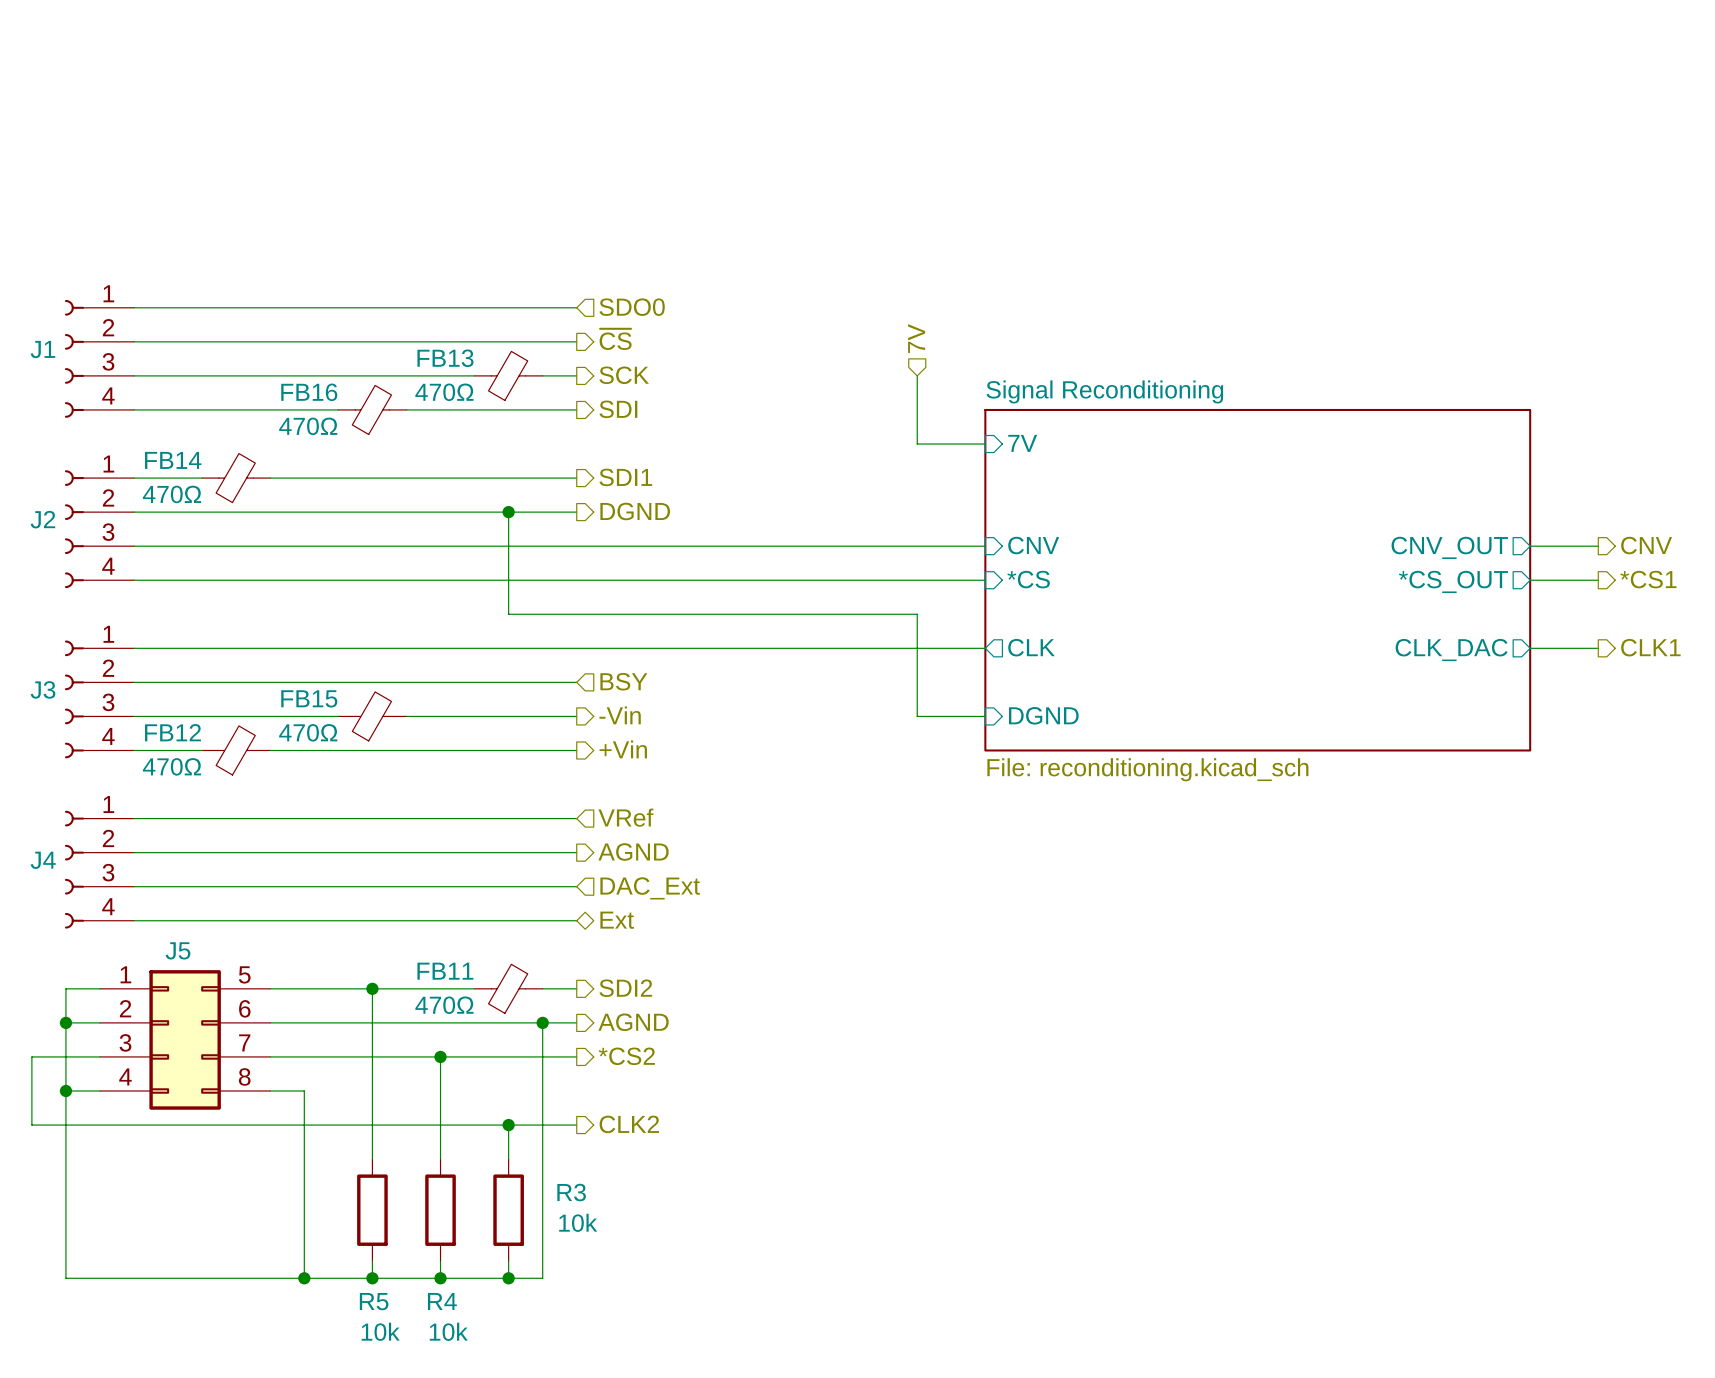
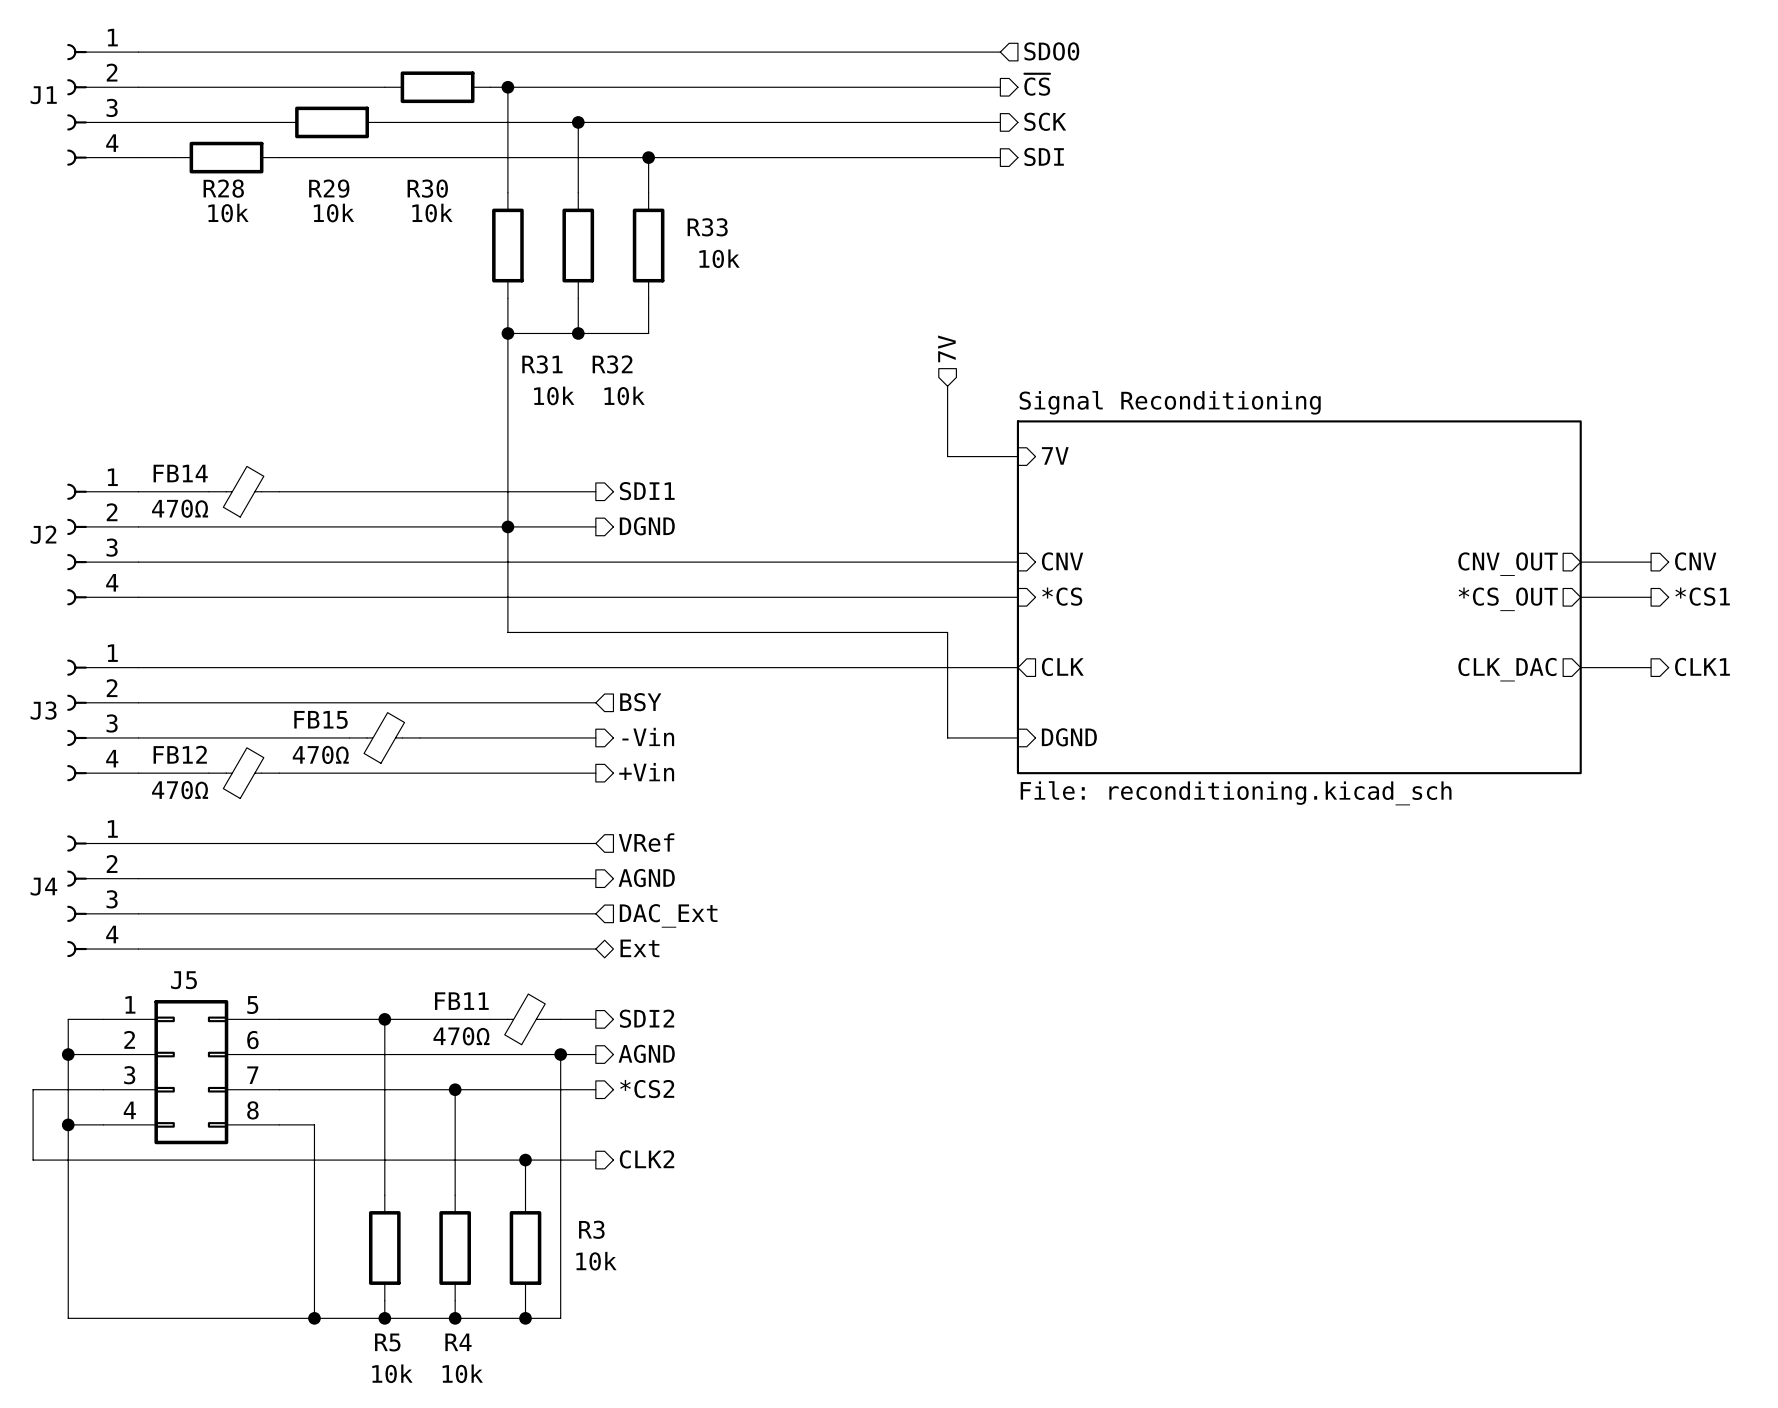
hierarchical label: none -> SDO0 (1051, 51)
wire: none -> (138, 52) (1000, 52)
hierarchical label: none -> ~{CS} (1037, 84)
wire: none -> (138, 87) (384, 87)
R30: none -> 10k (437, 87)
wire: none -> (490, 87) (1000, 87)
wire: none -> (507, 87) (507, 192)
junction: none -> (507, 87)
hierarchical label: none -> SCK (1045, 121)
wire: none -> (138, 122) (279, 122)
R29: none -> 10k (332, 122)
wire: none -> (384, 122) (1000, 122)
wire: none -> (578, 122) (578, 192)
junction: none -> (578, 122)
hierarchical label: none -> SDI (1044, 156)
wire: none -> (138, 157) (173, 157)
R28: none -> 10k (226, 157)
wire: none -> (279, 157) (1000, 157)
wire: none -> (648, 157) (648, 192)
junction: none -> (648, 157)
R31: none -> 10k (507, 245)
R32: none -> 10k (578, 245)
R33: none -> 10k (648, 245)
wire: none -> (578, 298) (578, 333)
wire: none -> (648, 298) (648, 333) (507, 333)
wire: (134, 307) (576, 307) -> none
hierarchical label: SDO0 (632, 307) -> none
junction: none -> (507, 333)
junction: none -> (578, 333)
hierarchical label: ~{CS} (615, 339) -> none
wire: (134, 341) (576, 341) -> none
J1 position: (99, 358) -> (102, 104)
wire: (134, 375) (474, 375) -> none
FB13: 470Ω (508, 375) -> none
wire: (542, 375) (576, 375) -> none
hierarchical label: SCK (624, 375) -> none
wire: (134, 409) (338, 409) -> none
FB16: 470Ω (372, 409) -> none
wire: (406, 409) (576, 409) -> none
hierarchical label: SDI (618, 409) -> none
wire: (508, 512) (508, 614) -> (507, 298) (507, 632) (525, 632)
junction position: (508, 512) -> (507, 526)

